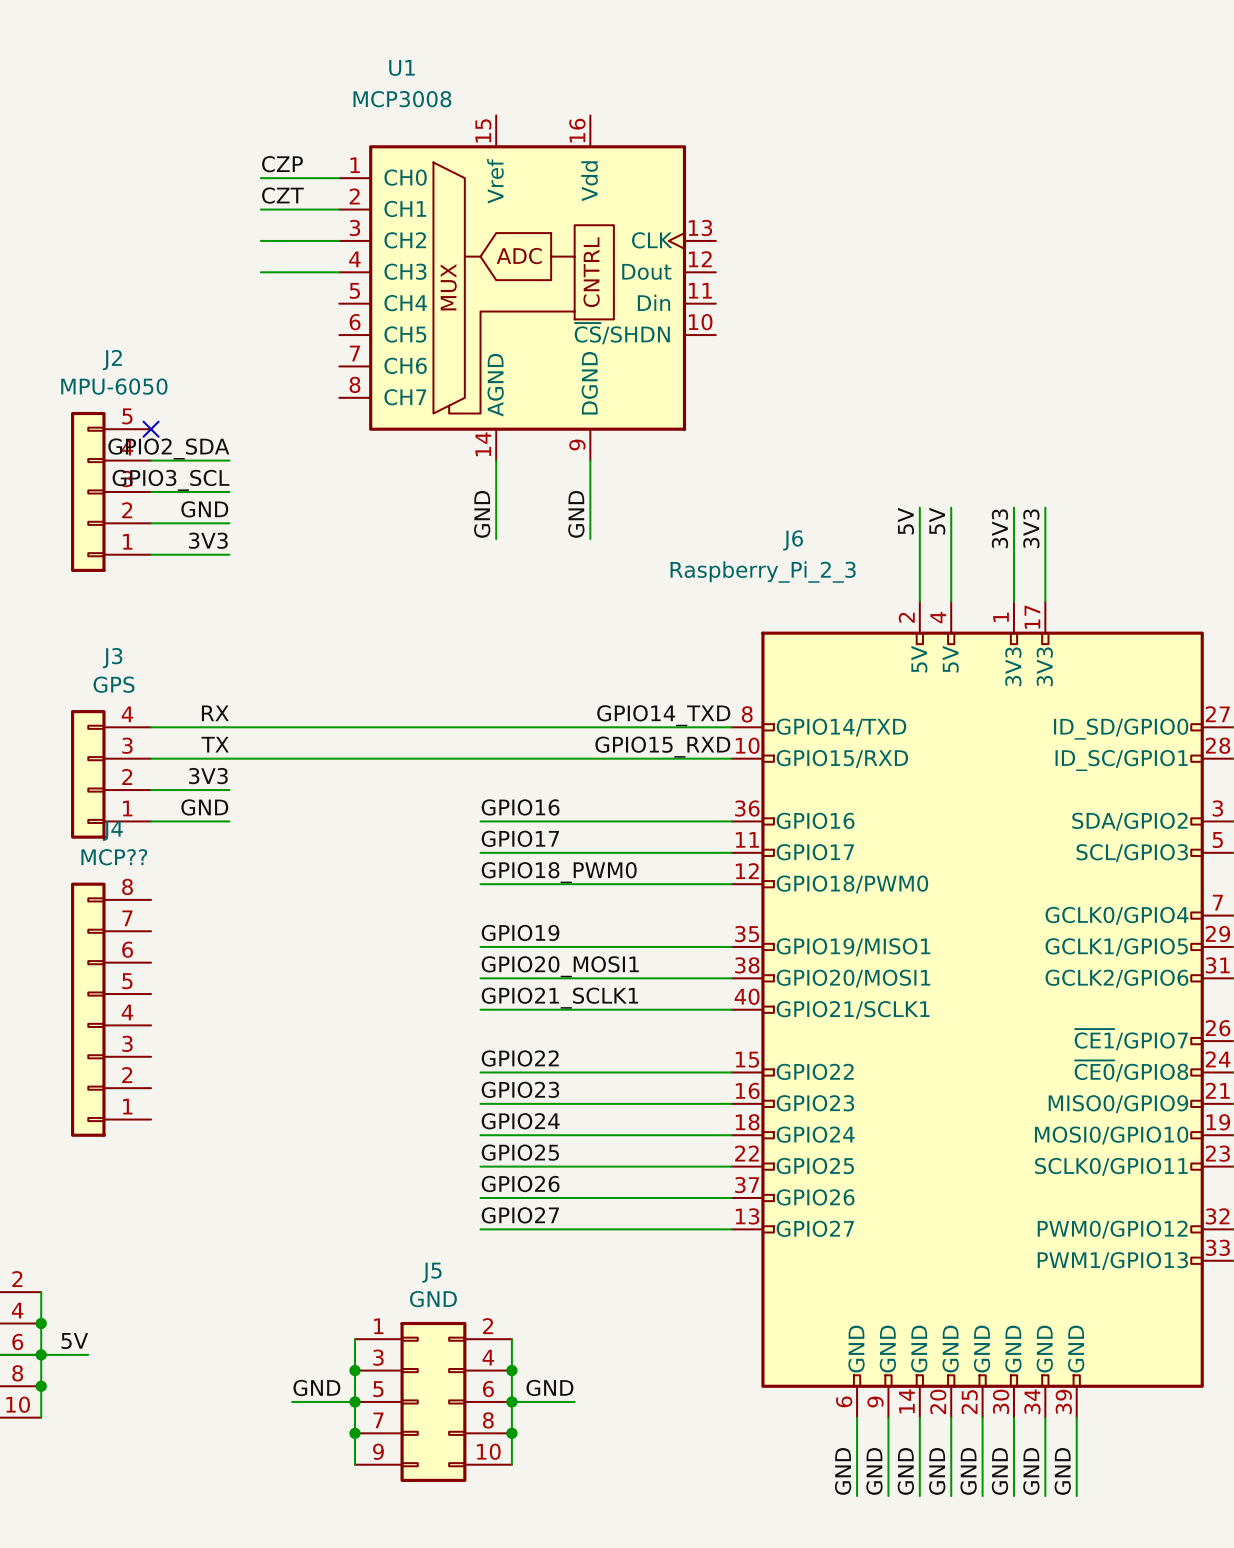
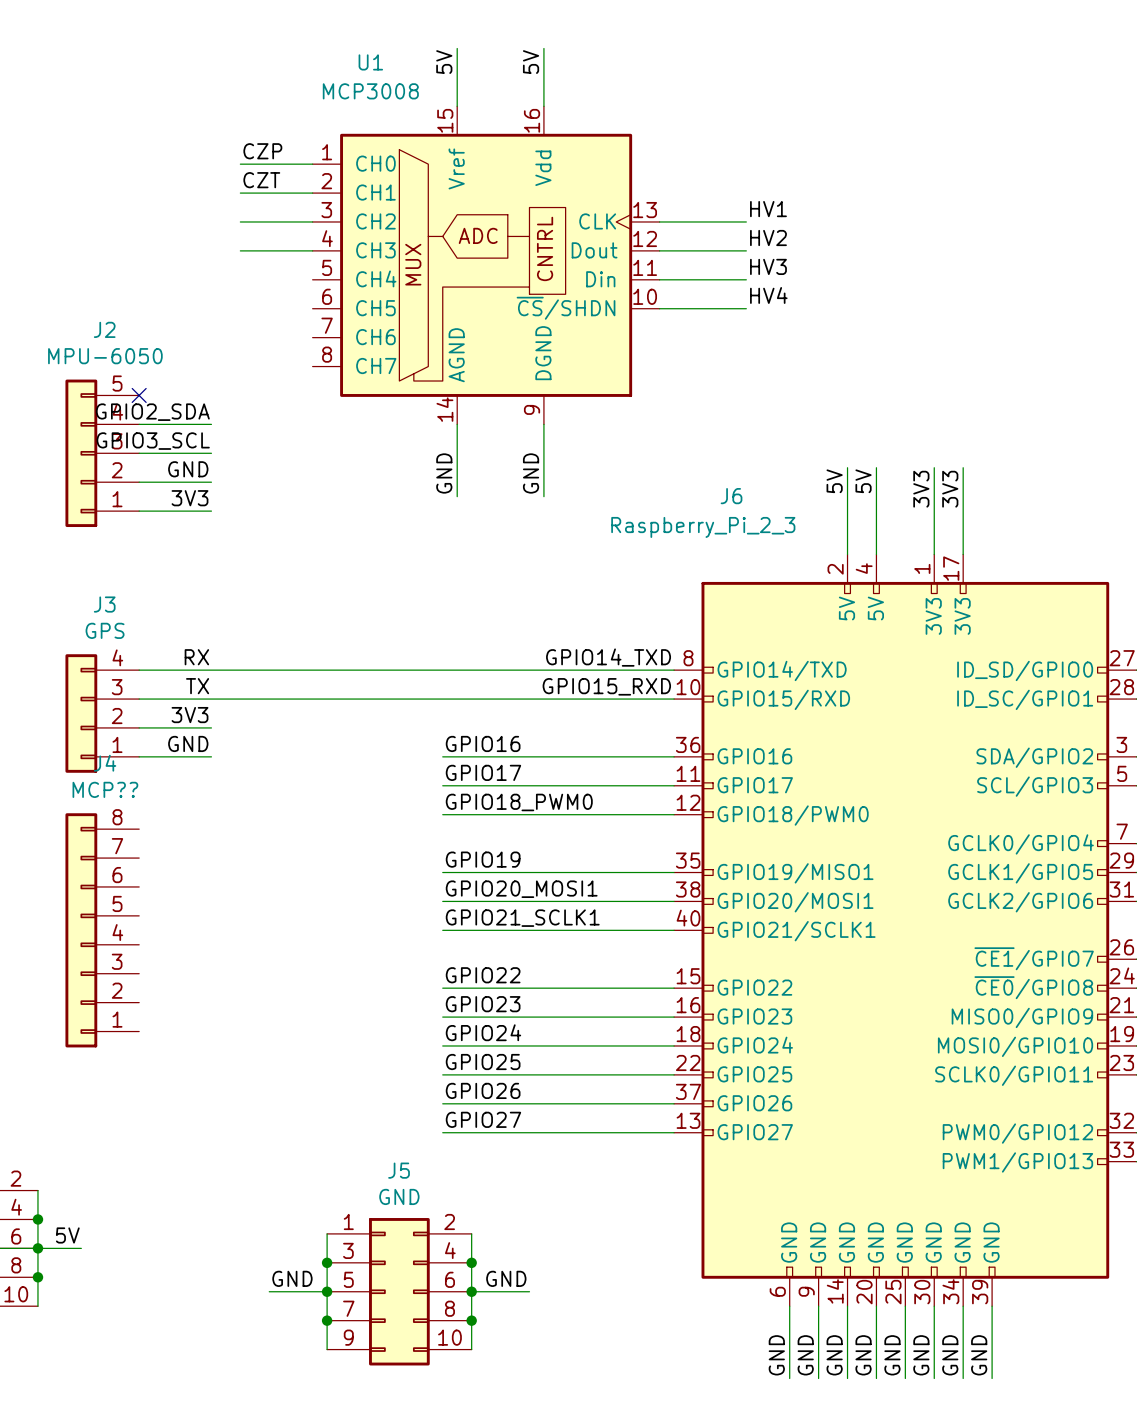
wire: none -> (457, 48) (457, 106)
wire: none -> (543, 48) (543, 106)
label: none -> 5V (444, 62)
label: none -> 5V (531, 62)
label: none -> HV1 (768, 209)
wire: none -> (659, 221) (746, 221)
label: none -> HV2 (768, 238)
wire: none -> (659, 250) (746, 250)
label: none -> HV3 (768, 266)
wire: none -> (659, 279) (746, 279)
label: none -> HV4 (768, 295)
wire: none -> (659, 308) (746, 308)

